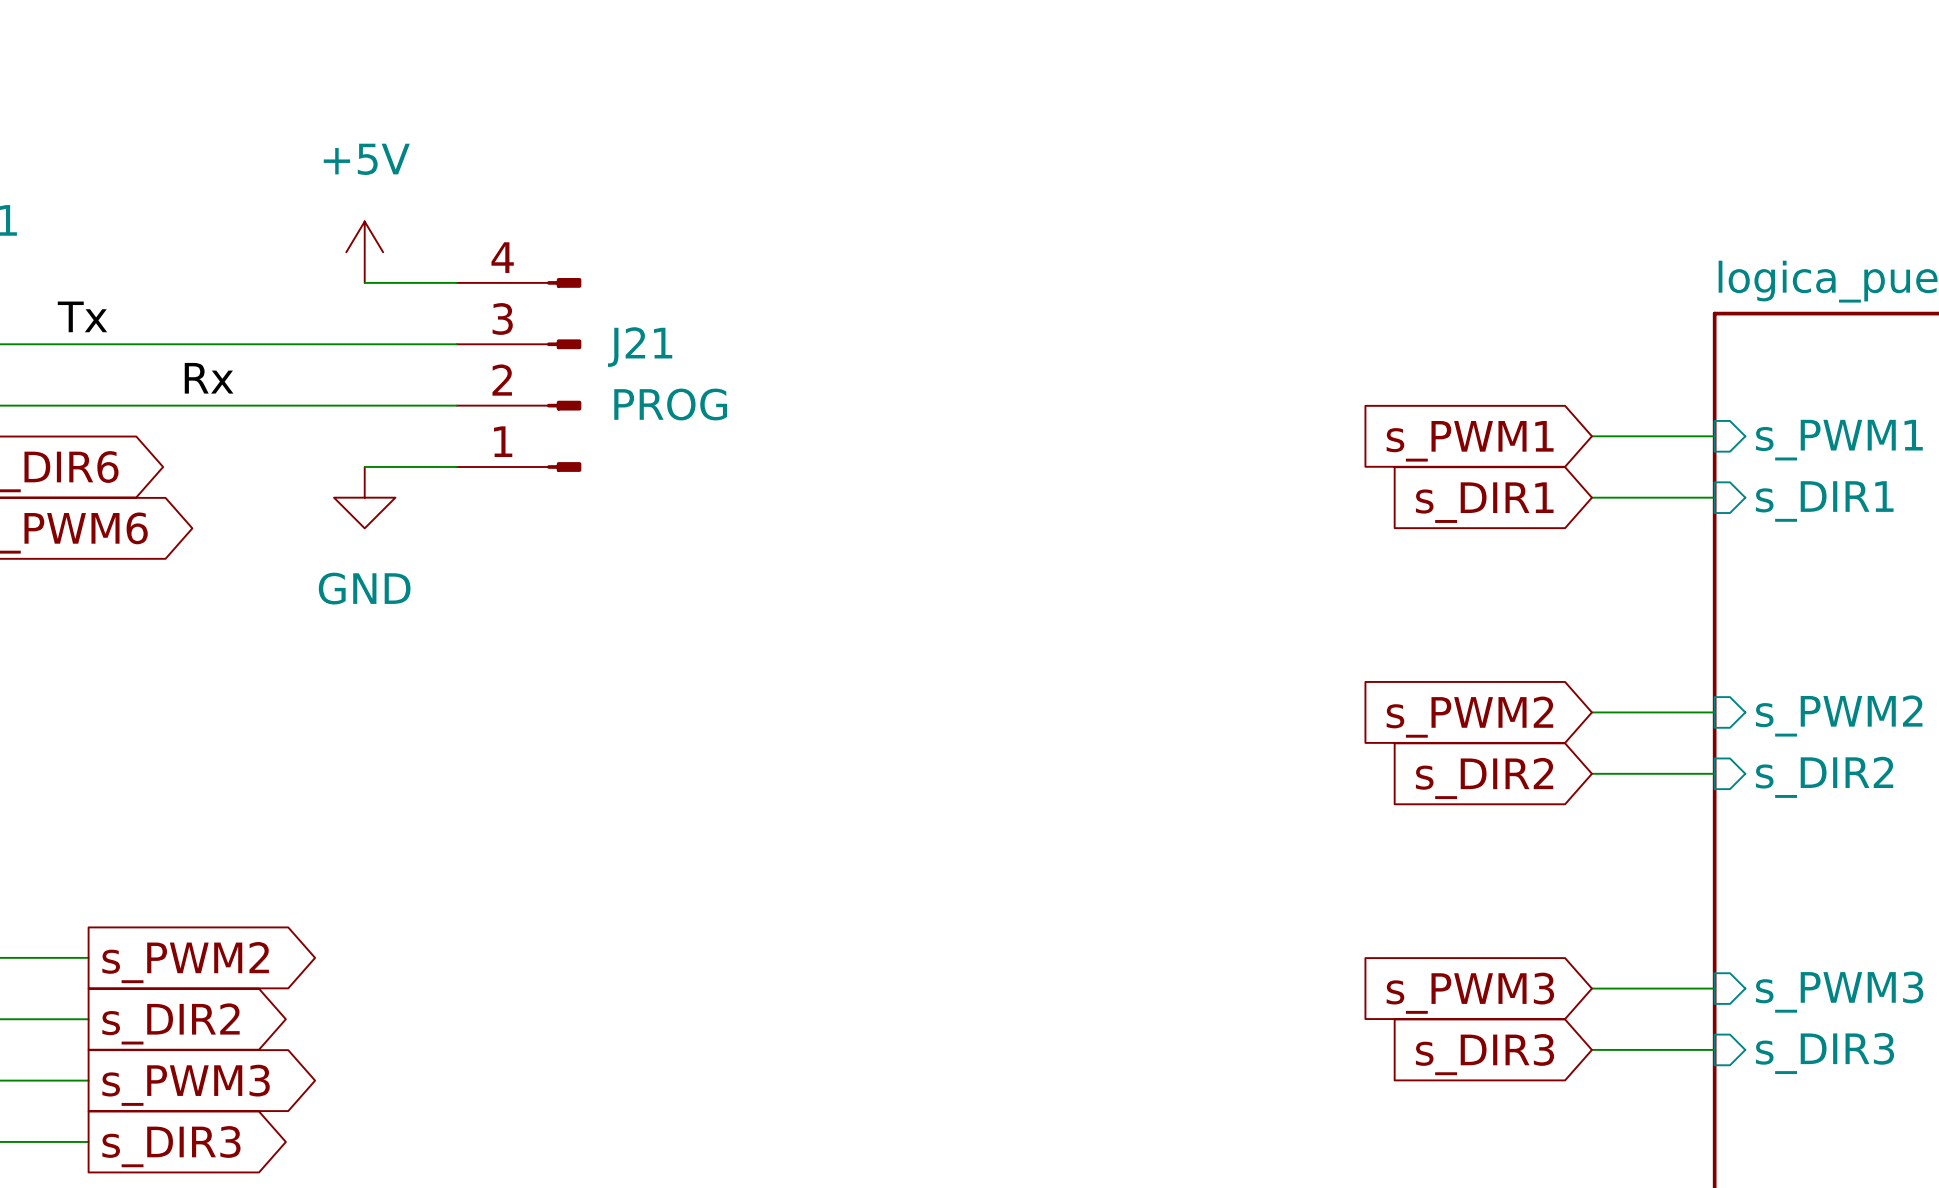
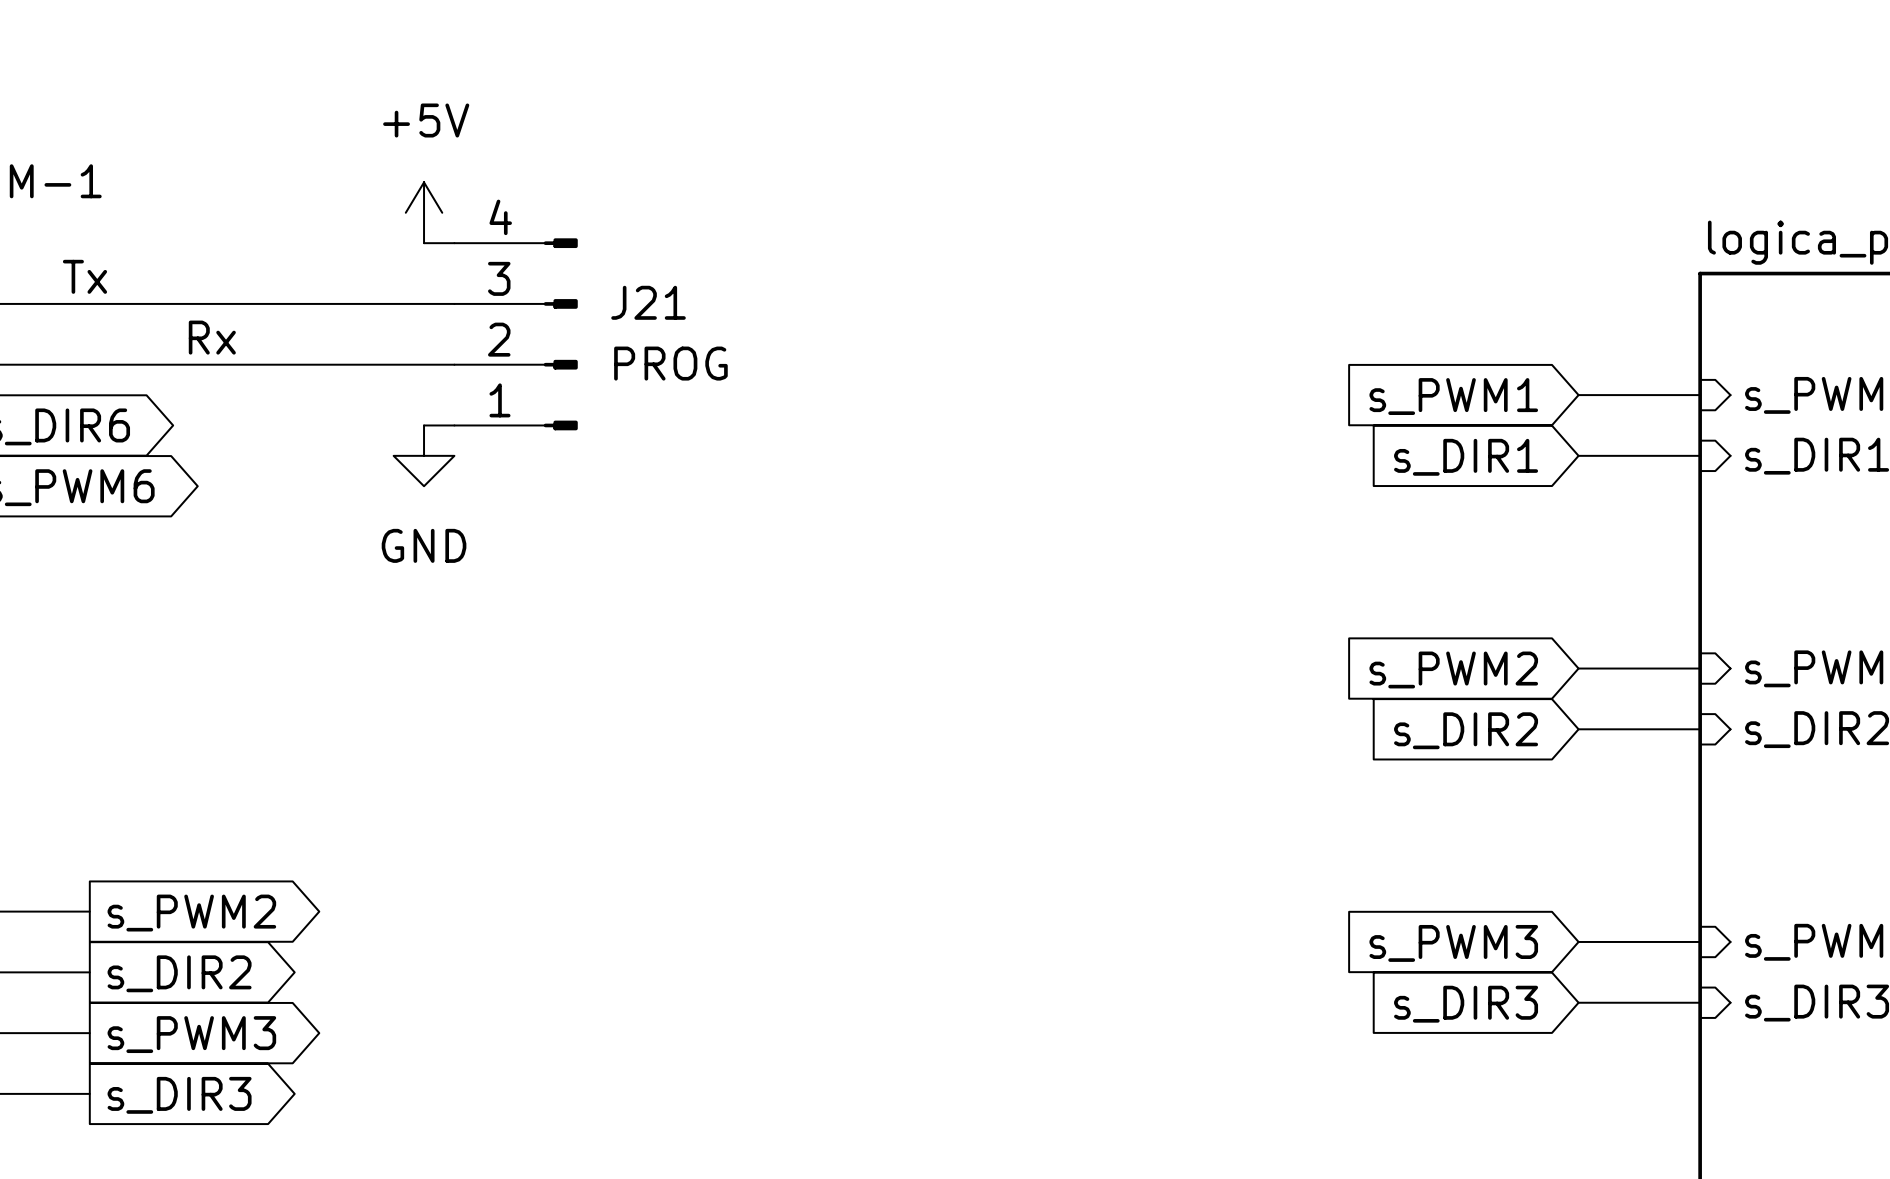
power symbol position: +5V (364, 252) -> +5V (424, 212)
wire: (364, 282) (426, 282) -> none
wire: (364, 466) (426, 466) -> none
power symbol position: GND (364, 497) -> GND (424, 455)

